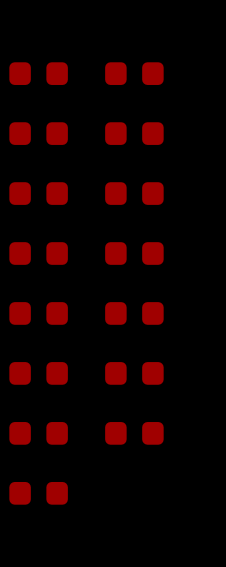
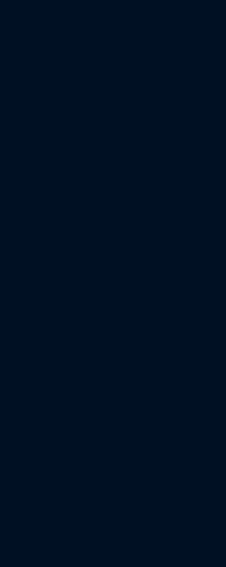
part: (38, 73) -> none
part: (134, 73) -> none
part: (38, 133) -> none
part: (134, 133) -> none
part: (38, 193) -> none
part: (134, 193) -> none
part: (38, 253) -> none
part: (134, 253) -> none
part: (38, 313) -> none
part: (134, 313) -> none
part: (38, 373) -> none
part: (134, 373) -> none
part: (38, 433) -> none
part: (134, 433) -> none
part: (38, 493) -> none

